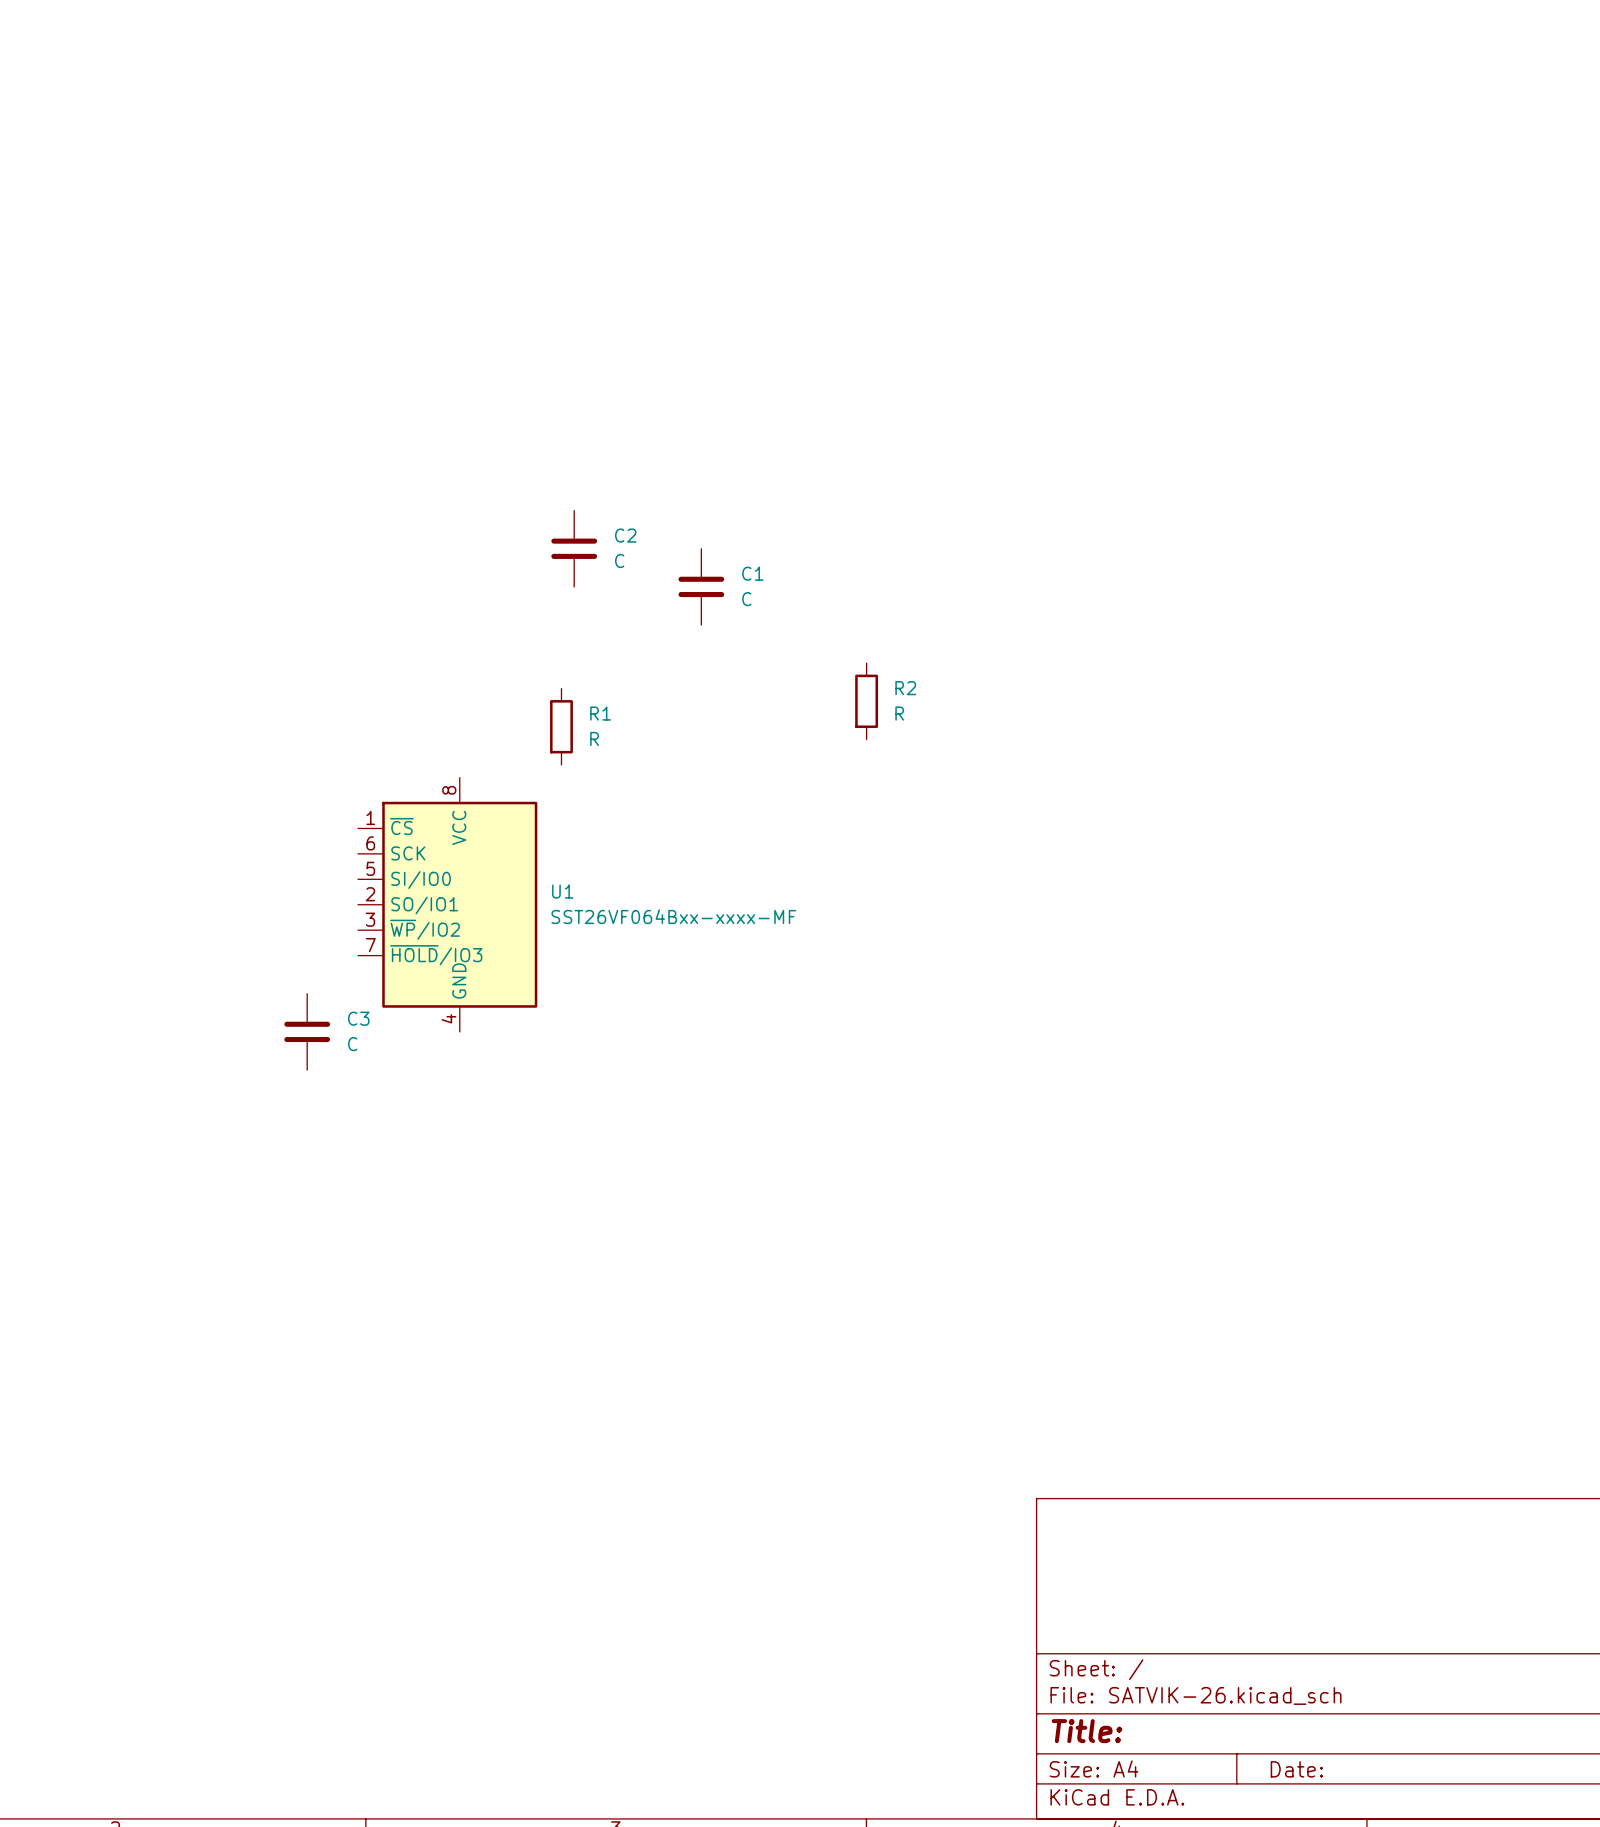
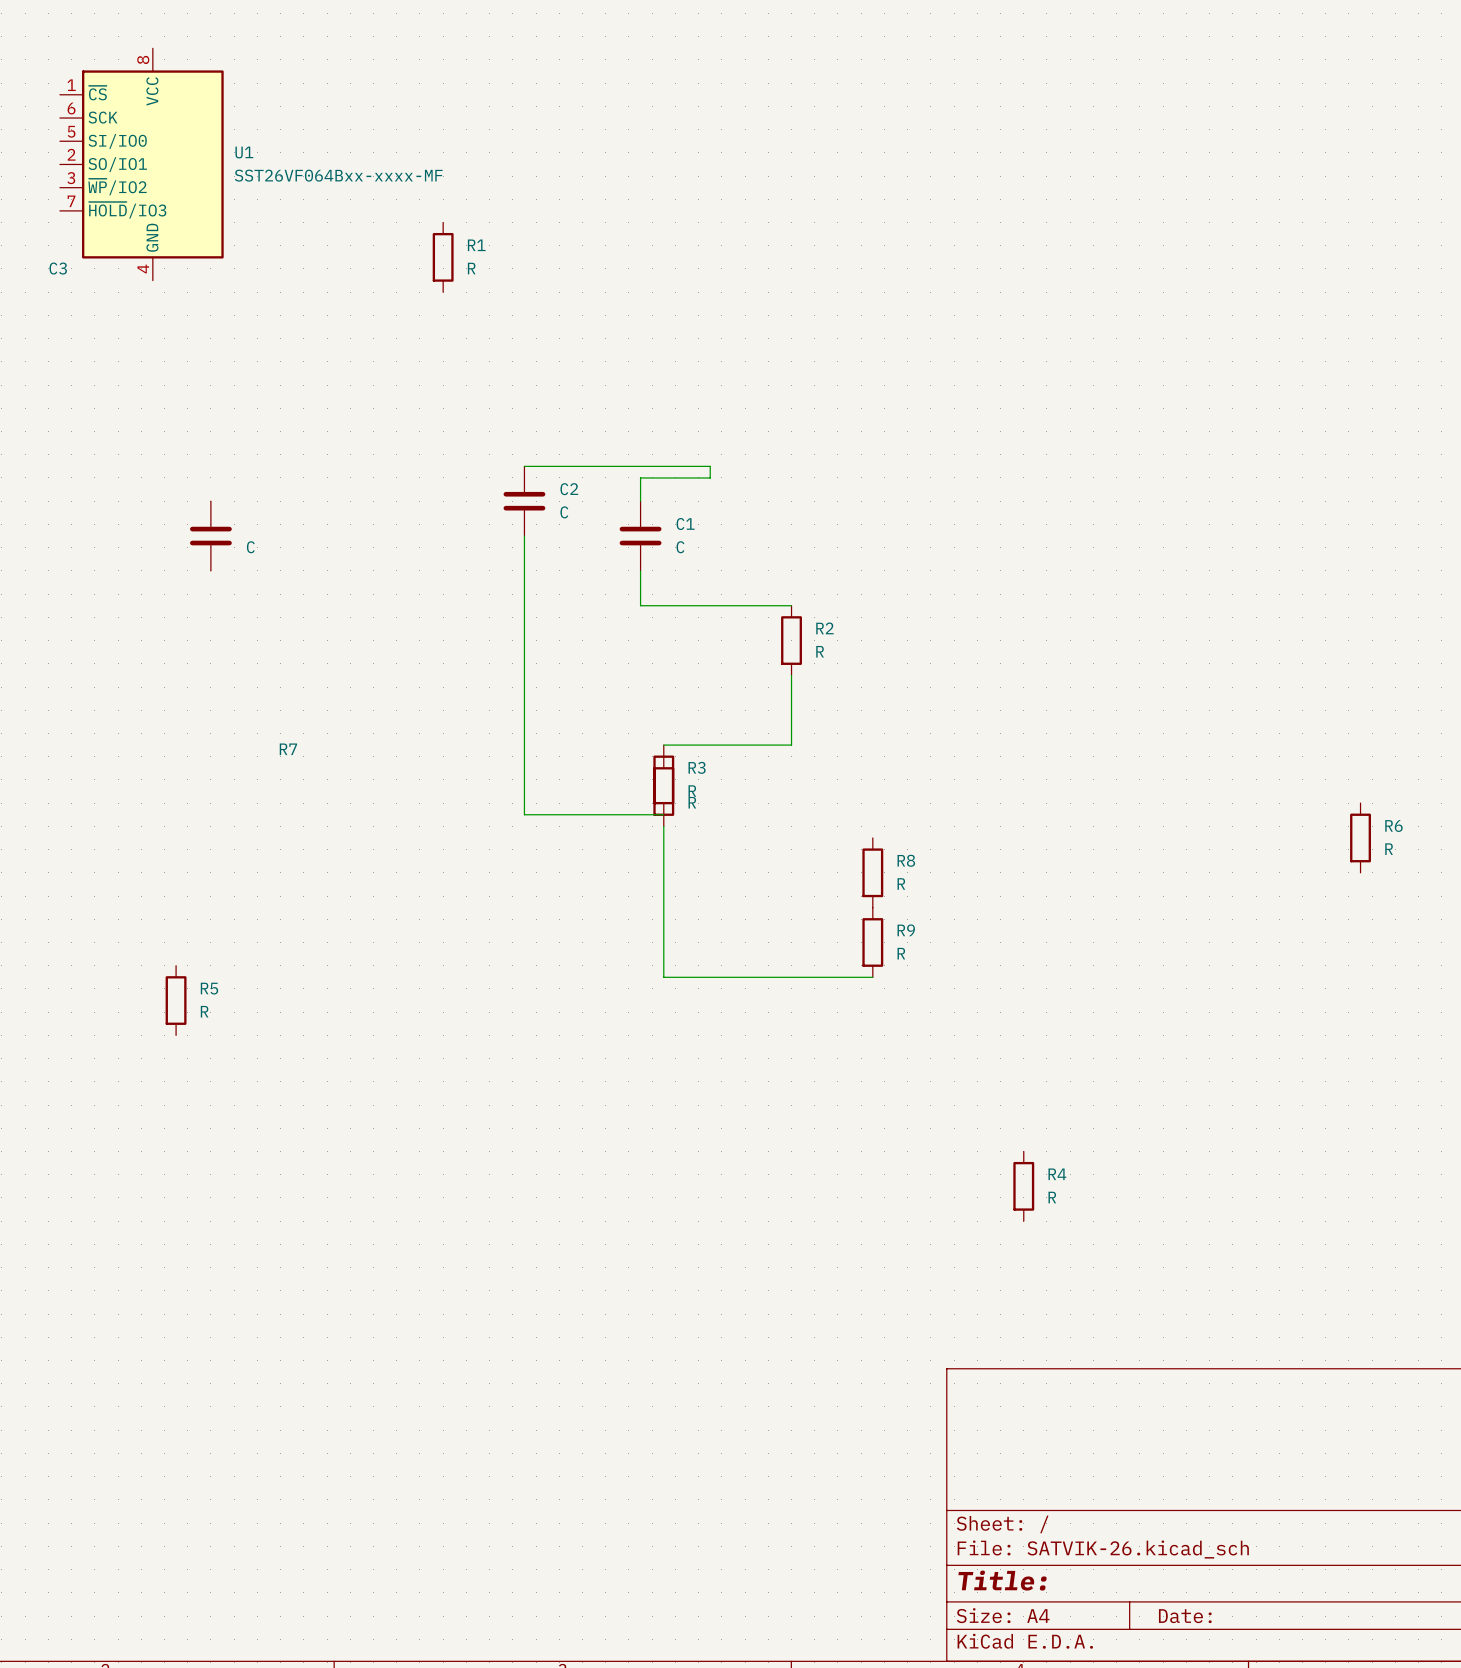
wire: none -> (524, 466) (710, 466) (710, 477) (640, 477) (640, 501)
wire: none -> (524, 536) (524, 814) (663, 814)
wire: none -> (640, 570) (640, 605) (791, 605)
R1 position: (561, 726) -> (443, 257)
wire: none -> (791, 675) (791, 745) (663, 745)
R3: none -> R (663, 779)
R7: none -> R (663, 791)
U1 position: (447, 904) -> (141, 164)
wire: none -> (663, 826) (663, 977) (872, 977)
R6: none -> R (1360, 837)
R8: none -> R (872, 872)
C3 name position: C3 (358, 1018) -> C3 (58, 268)
C3 position: (307, 1031) -> (210, 536)
R9: none -> R (872, 942)
R5: none -> R (176, 1000)
R4: none -> R (1023, 1186)

